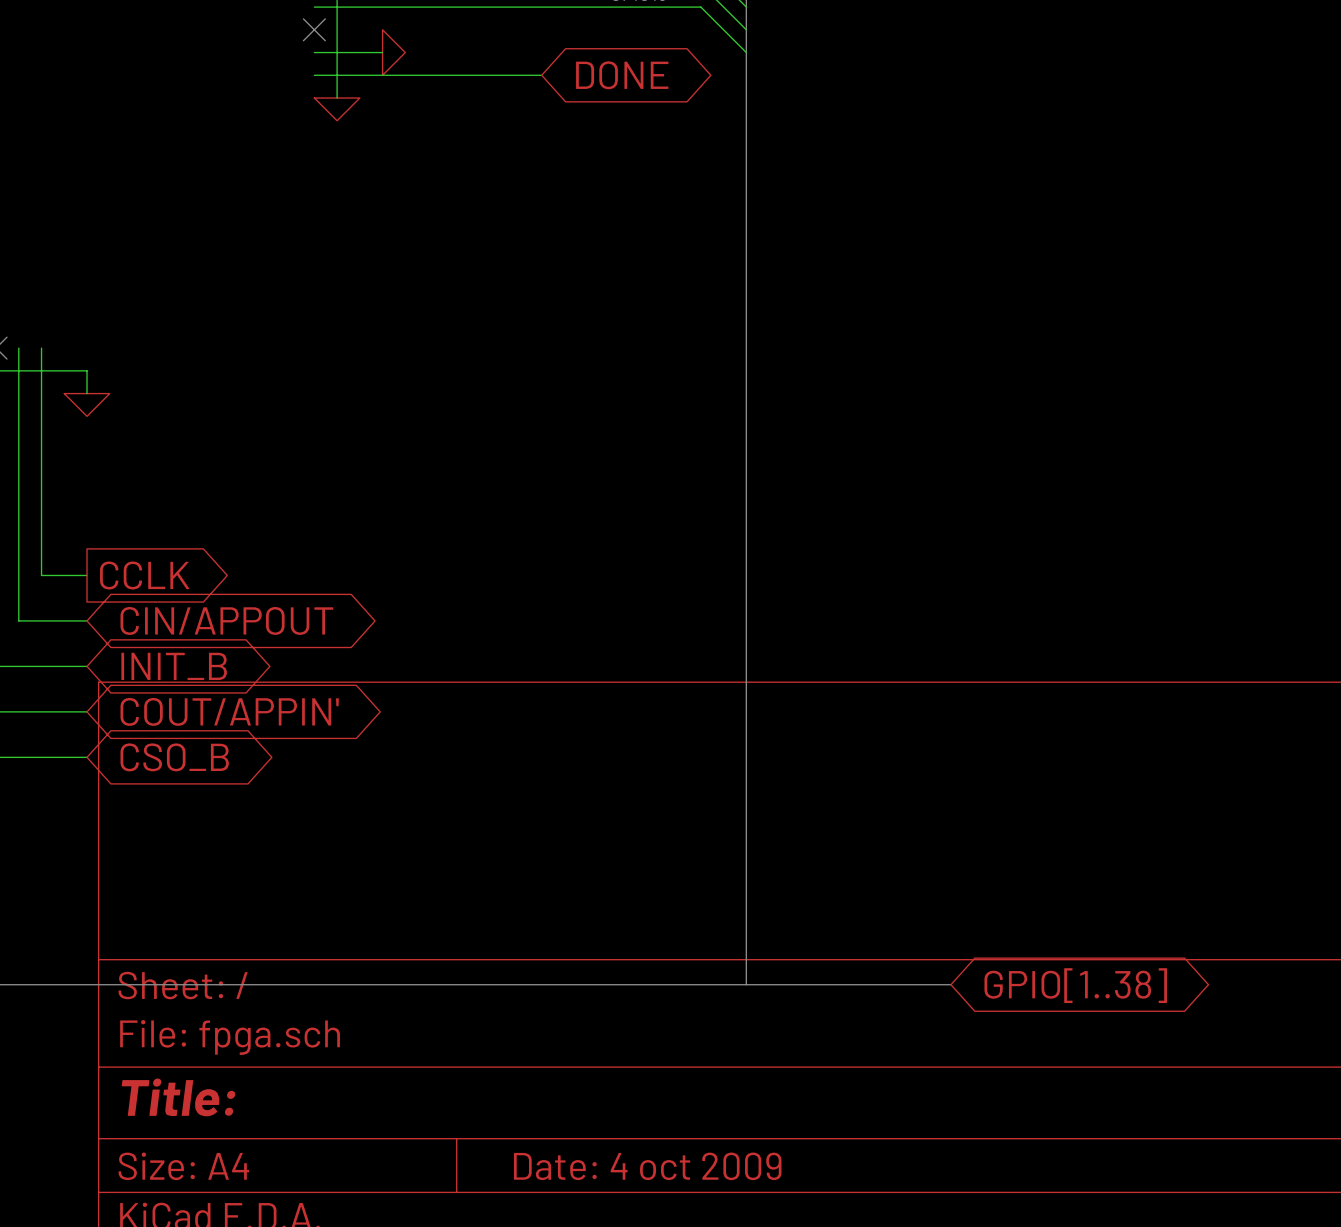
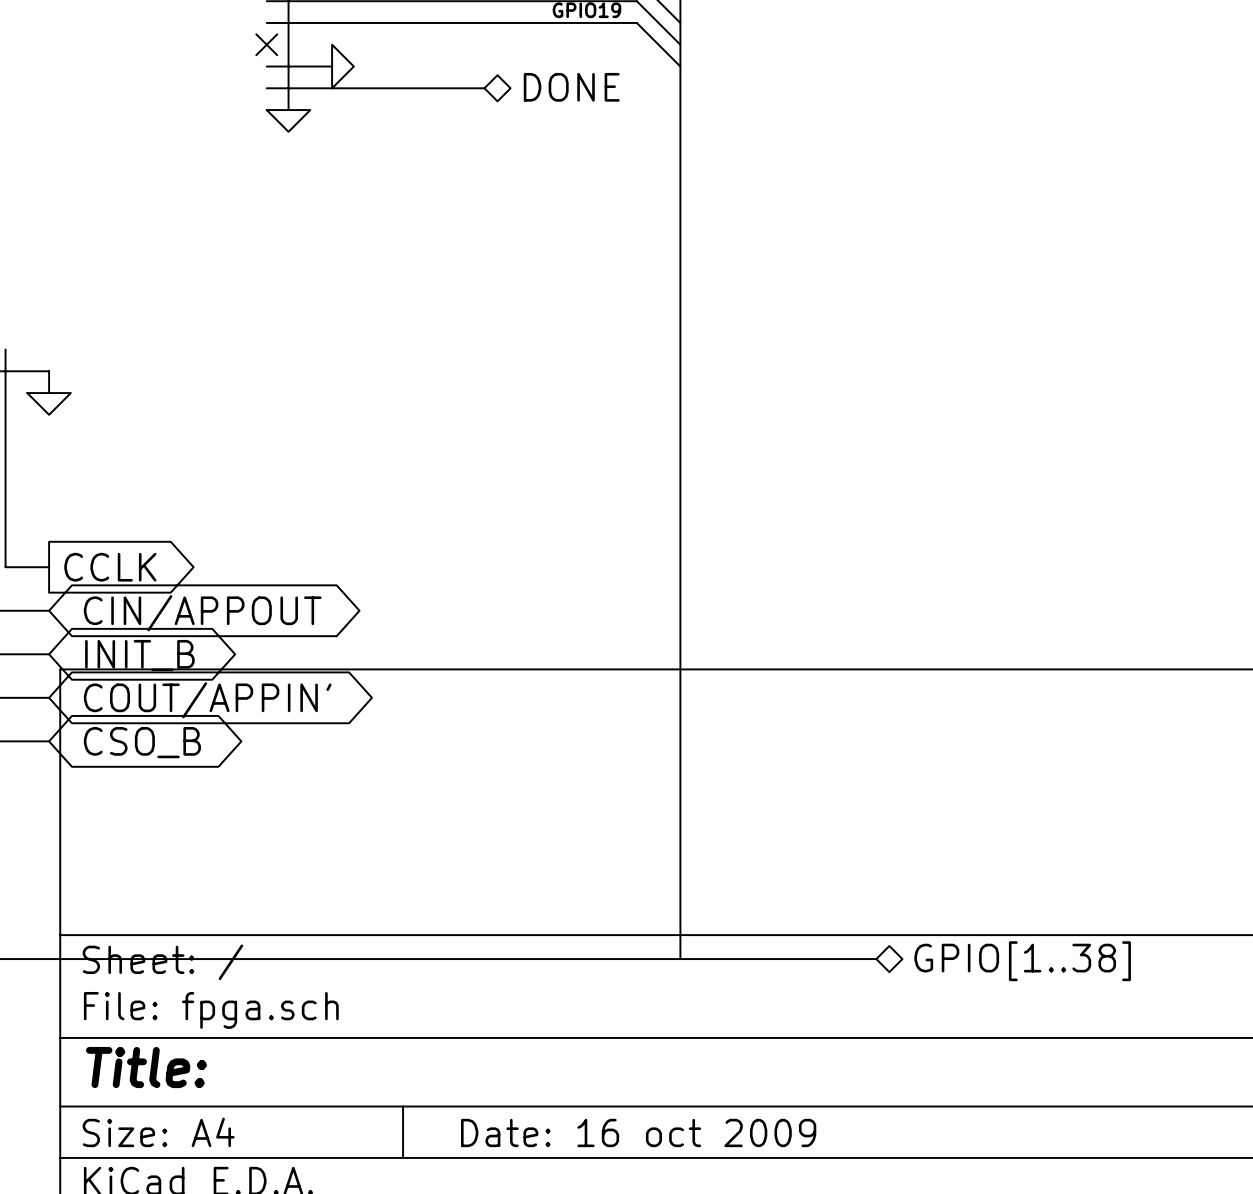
hierarchical label: none -> DONE (571, 87)
global label: DONE (622, 75) -> none
hierarchical label: none -> GPIO[1..38] (1022, 961)
global label: GPIO[1..38] (1075, 985) -> none
title block: Date: 4 oct 2009 (647, 1166) -> Date: 16 oct 2009 (638, 1132)

